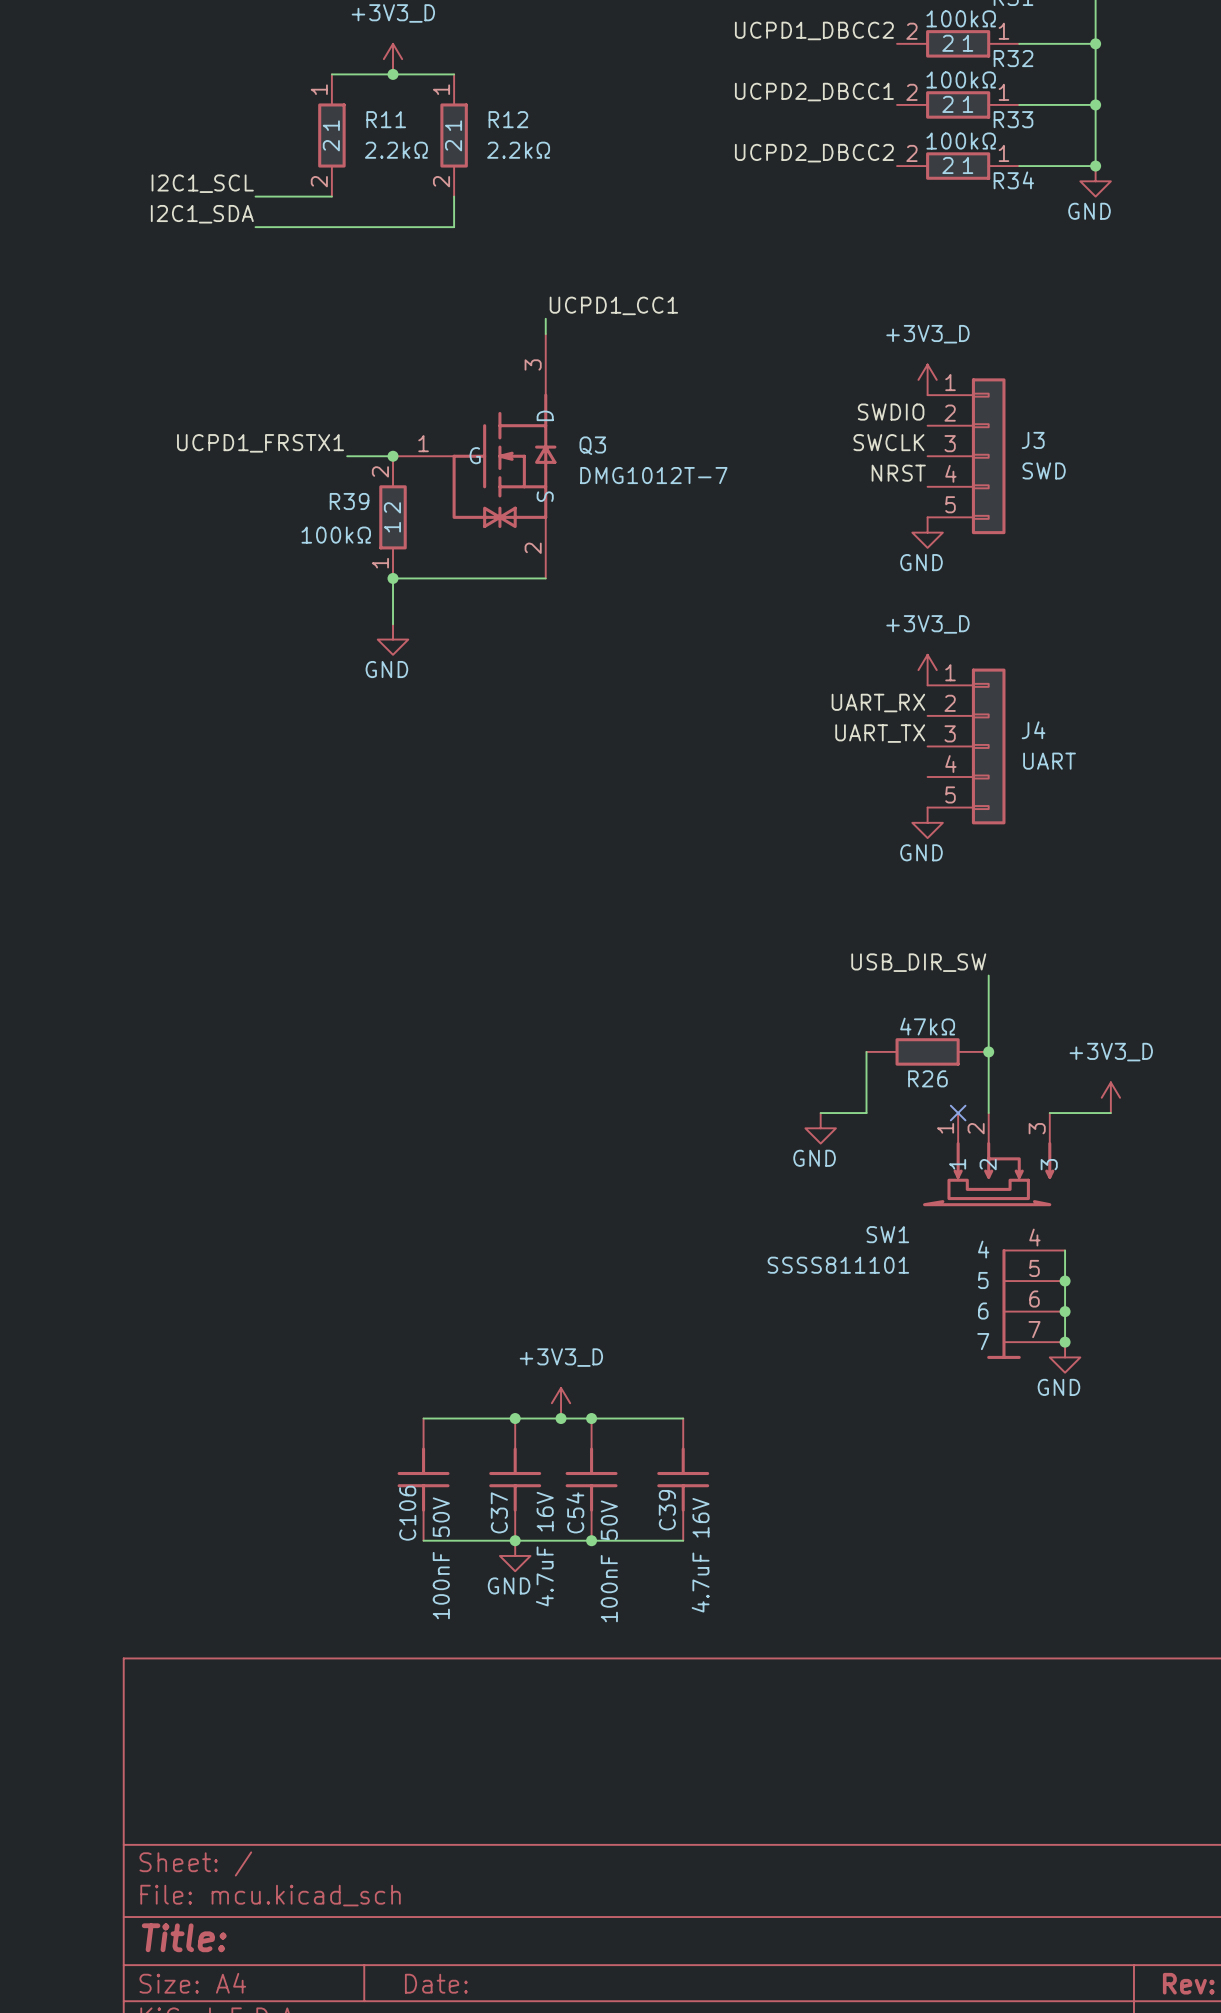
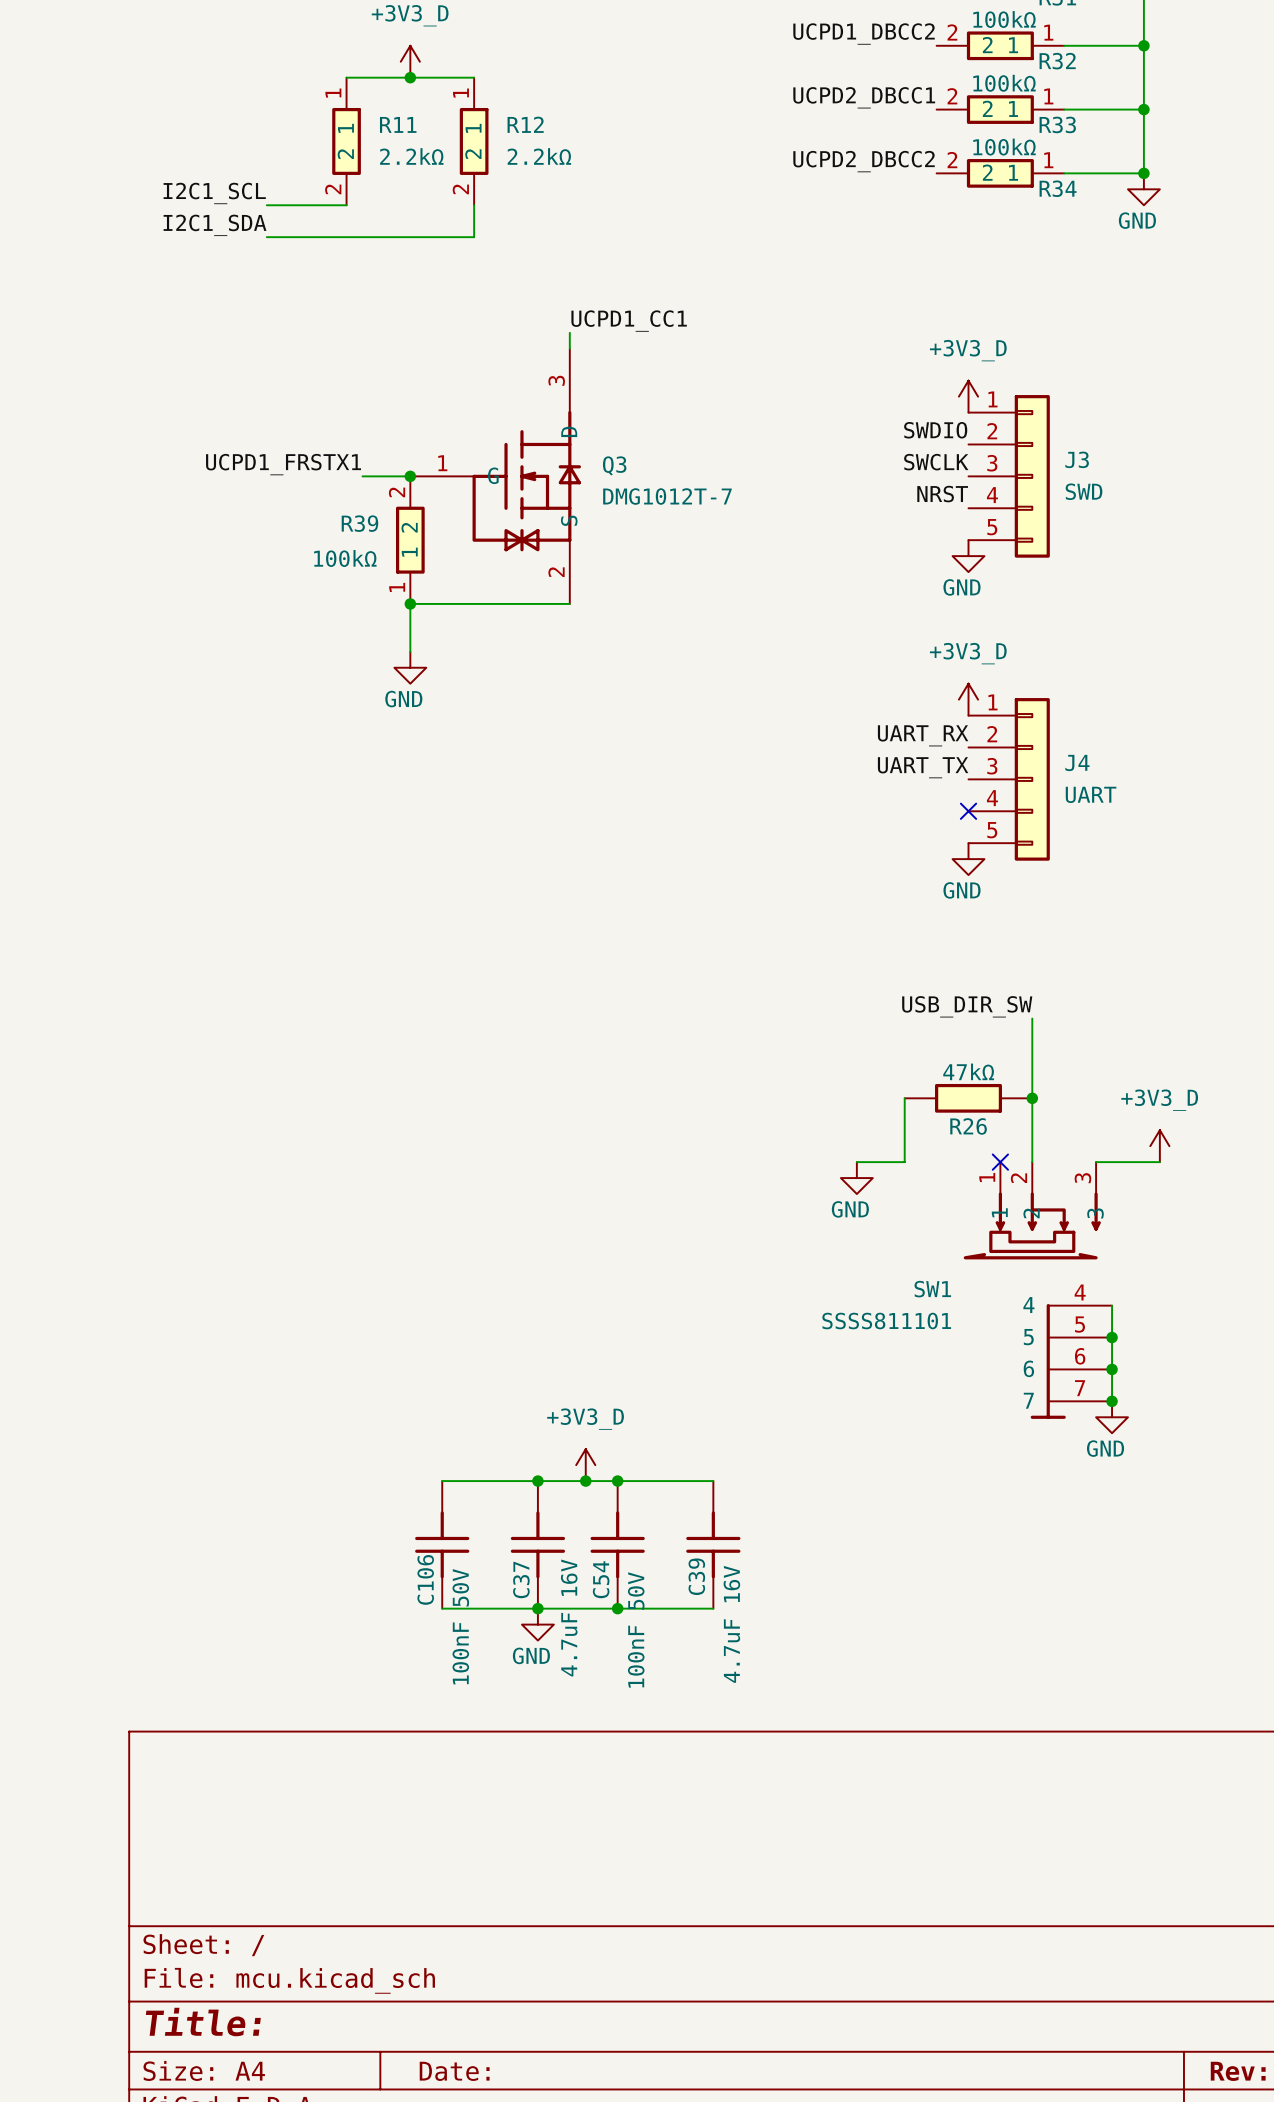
no-connect mark: none -> (968, 811)

